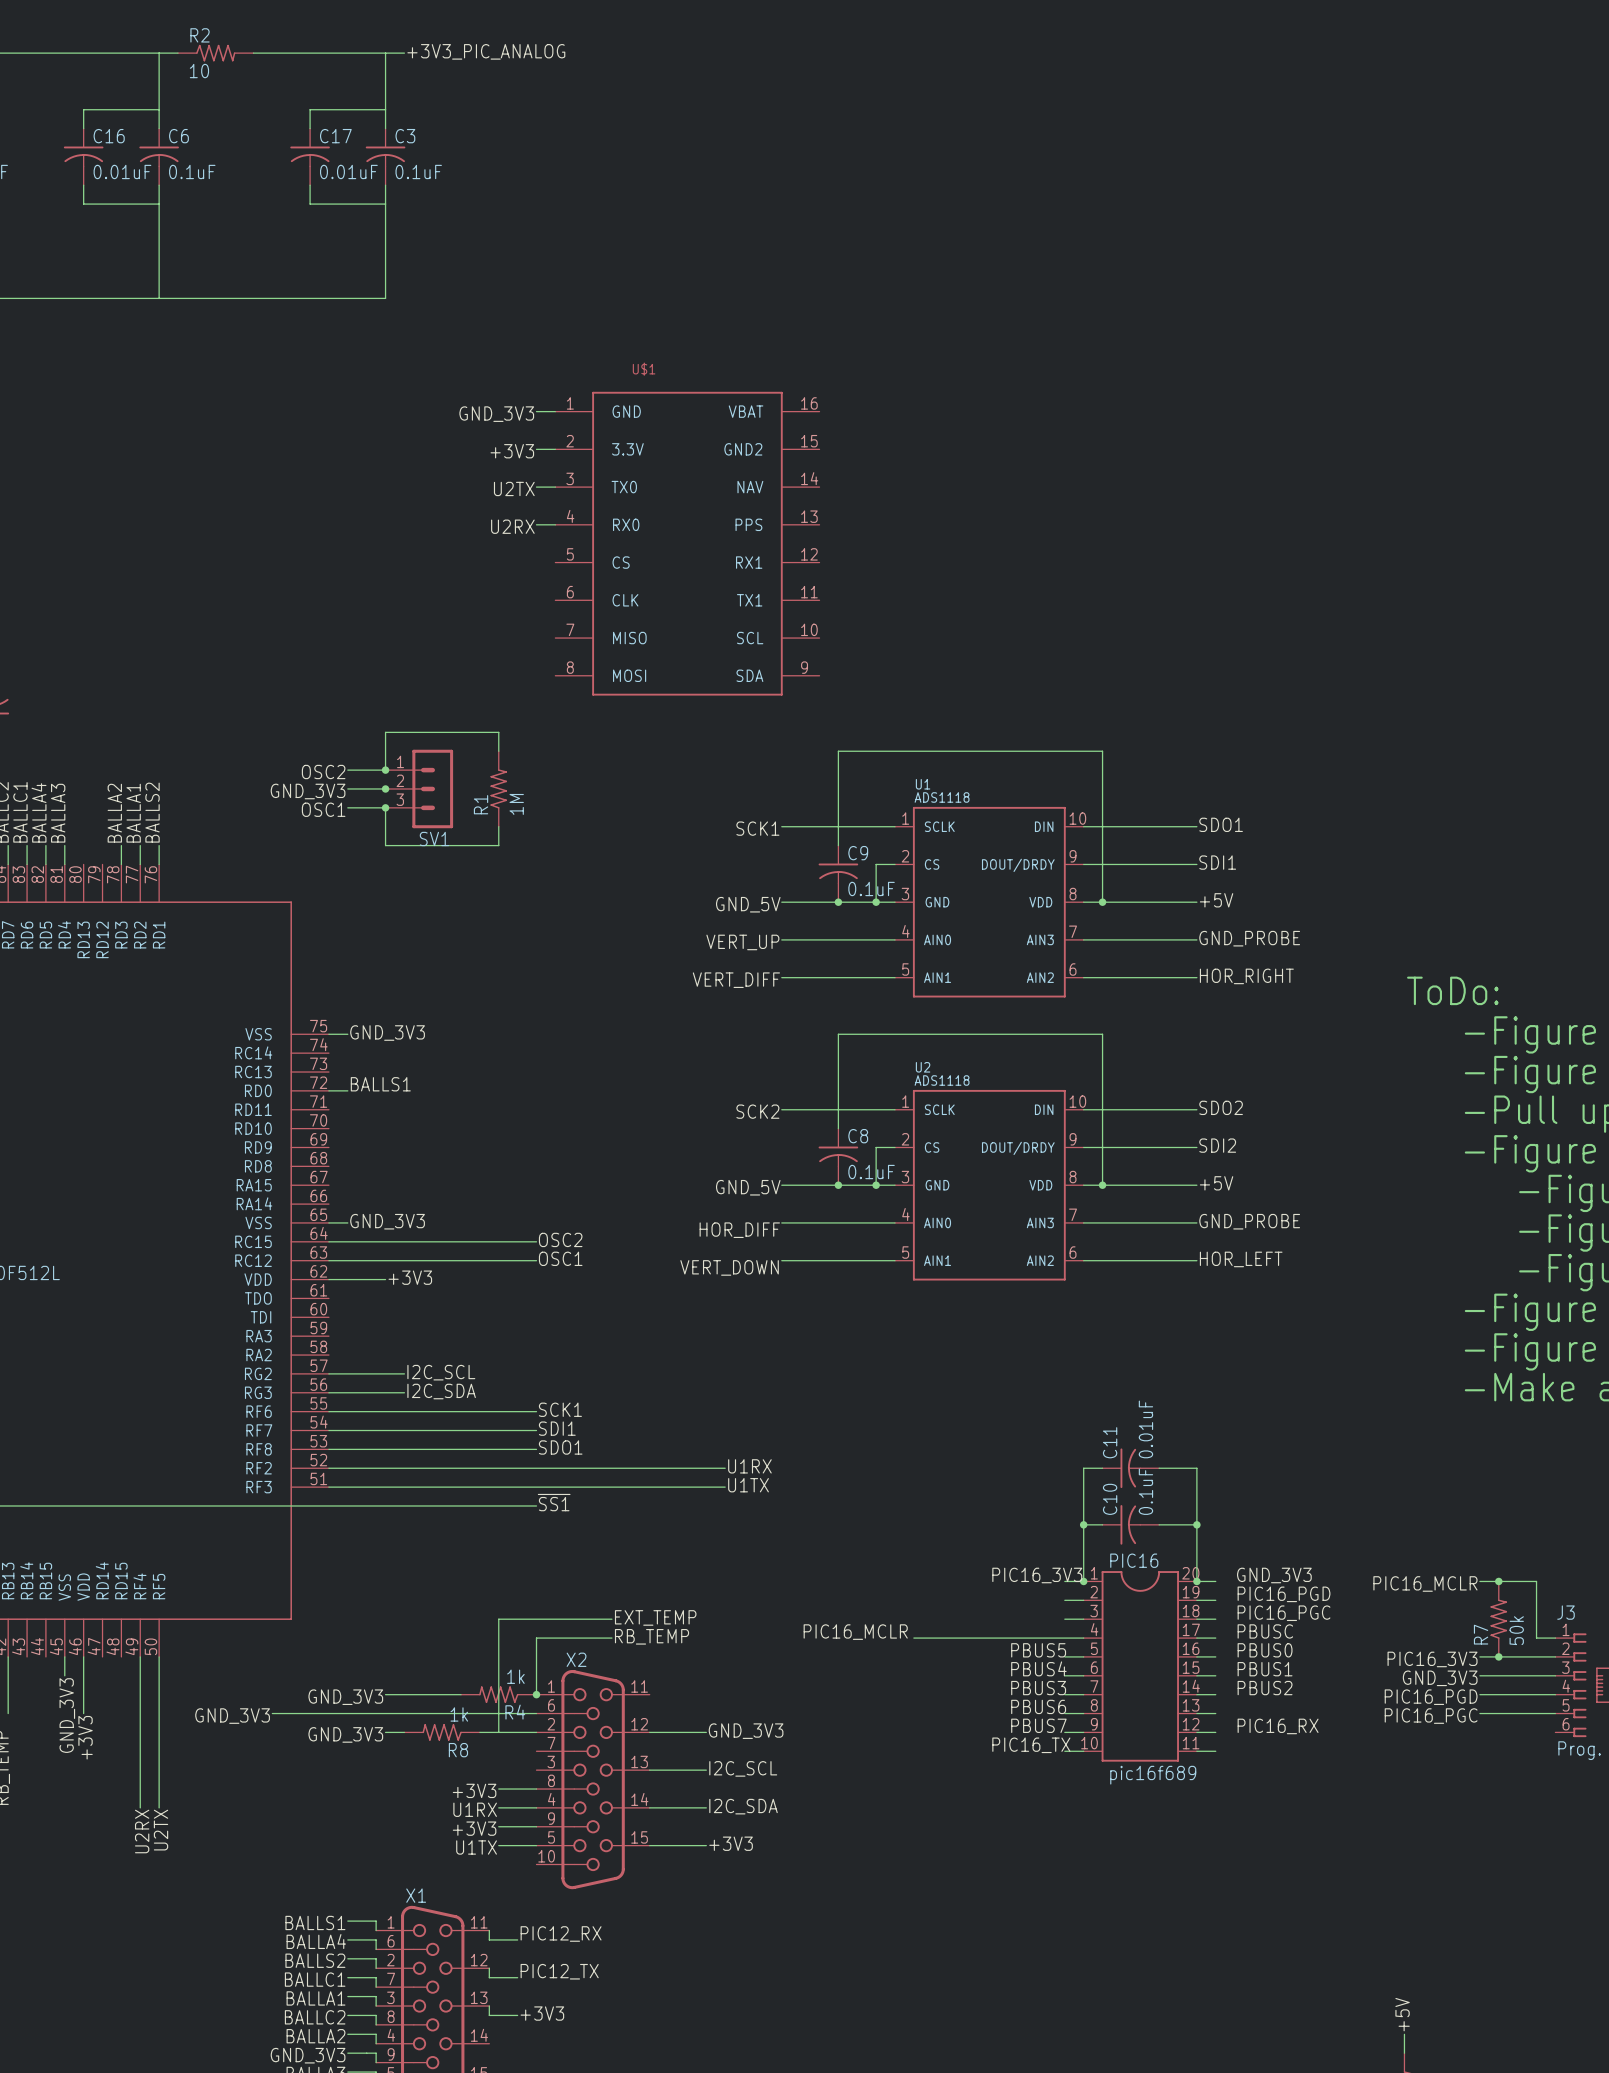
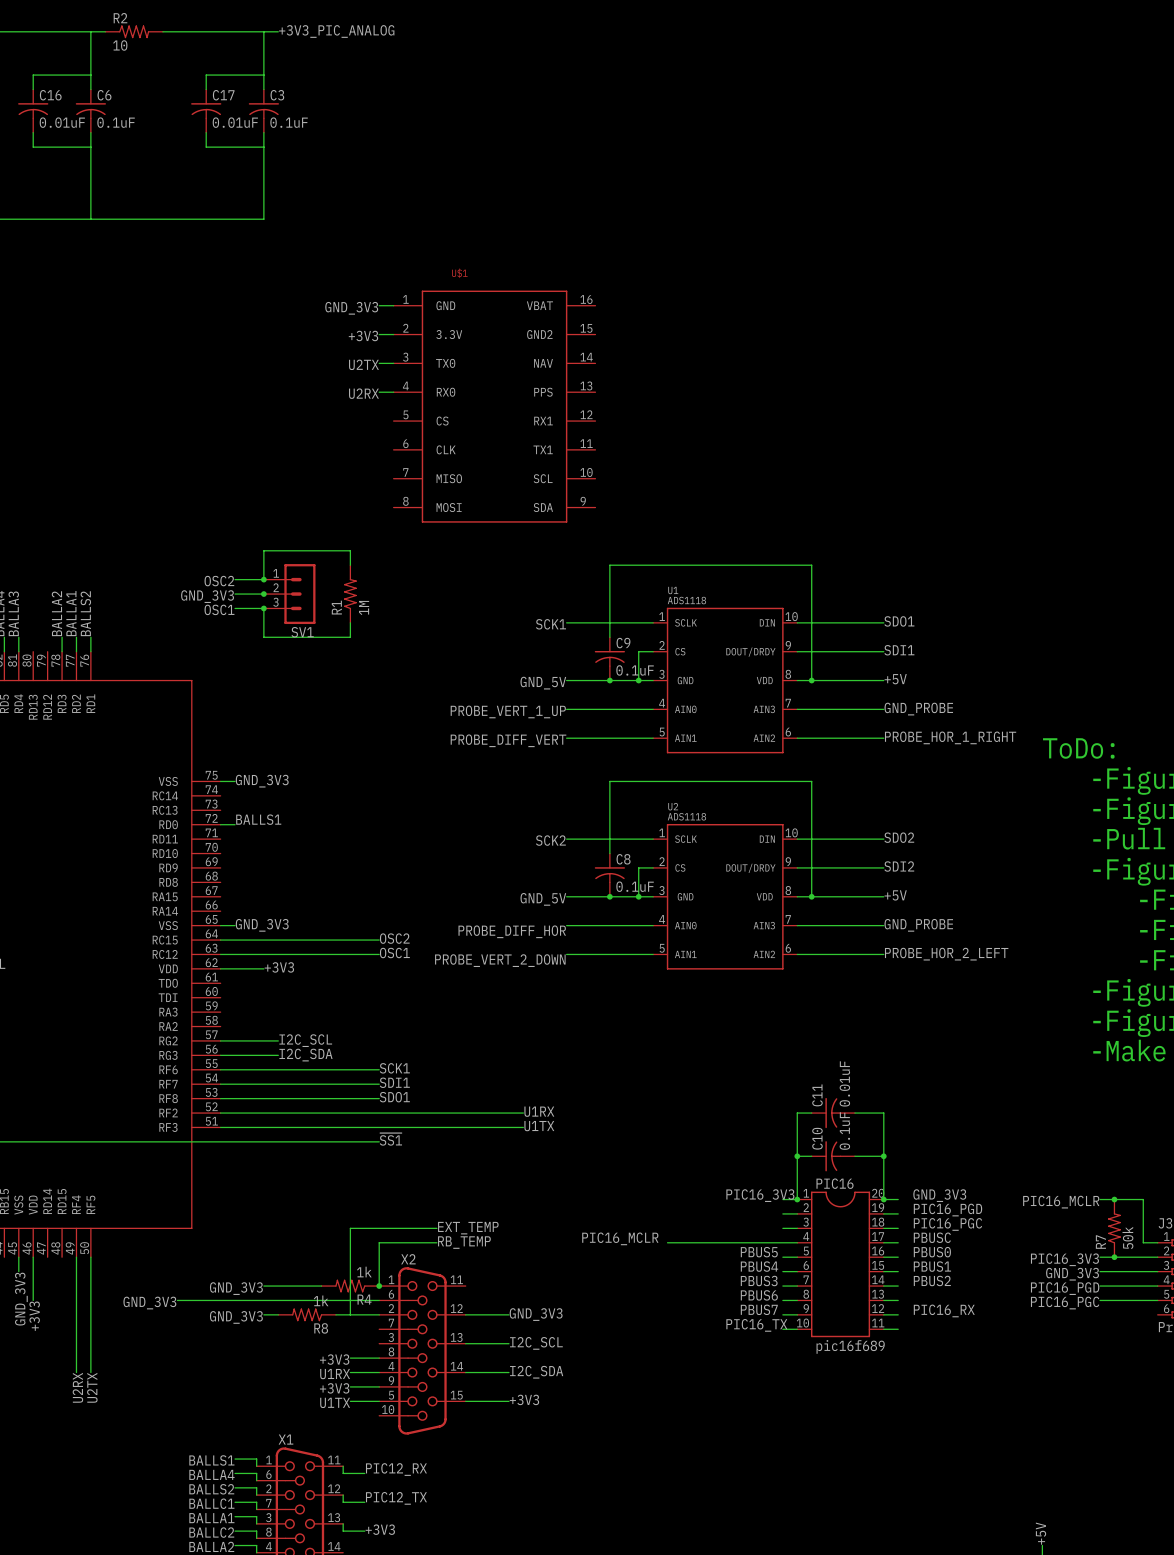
label: VERT_UP (742, 942) -> PROBE_VERT_1_UP (508, 711)
label: HOR_RIGHT (1246, 976) -> PROBE_HOR_1_RIGHT (950, 737)
label: VERT_DIFF (736, 980) -> PROBE_DIFF_VERT (508, 740)
label: HOR_DIFF (739, 1230) -> PROBE_DIFF_HOR (512, 931)
label: HOR_LEFT (1241, 1259) -> PROBE_HOR_2_LEFT (946, 954)
label: VERT_DOWN (729, 1267) -> PROBE_VERT_2_DOWN (500, 960)

